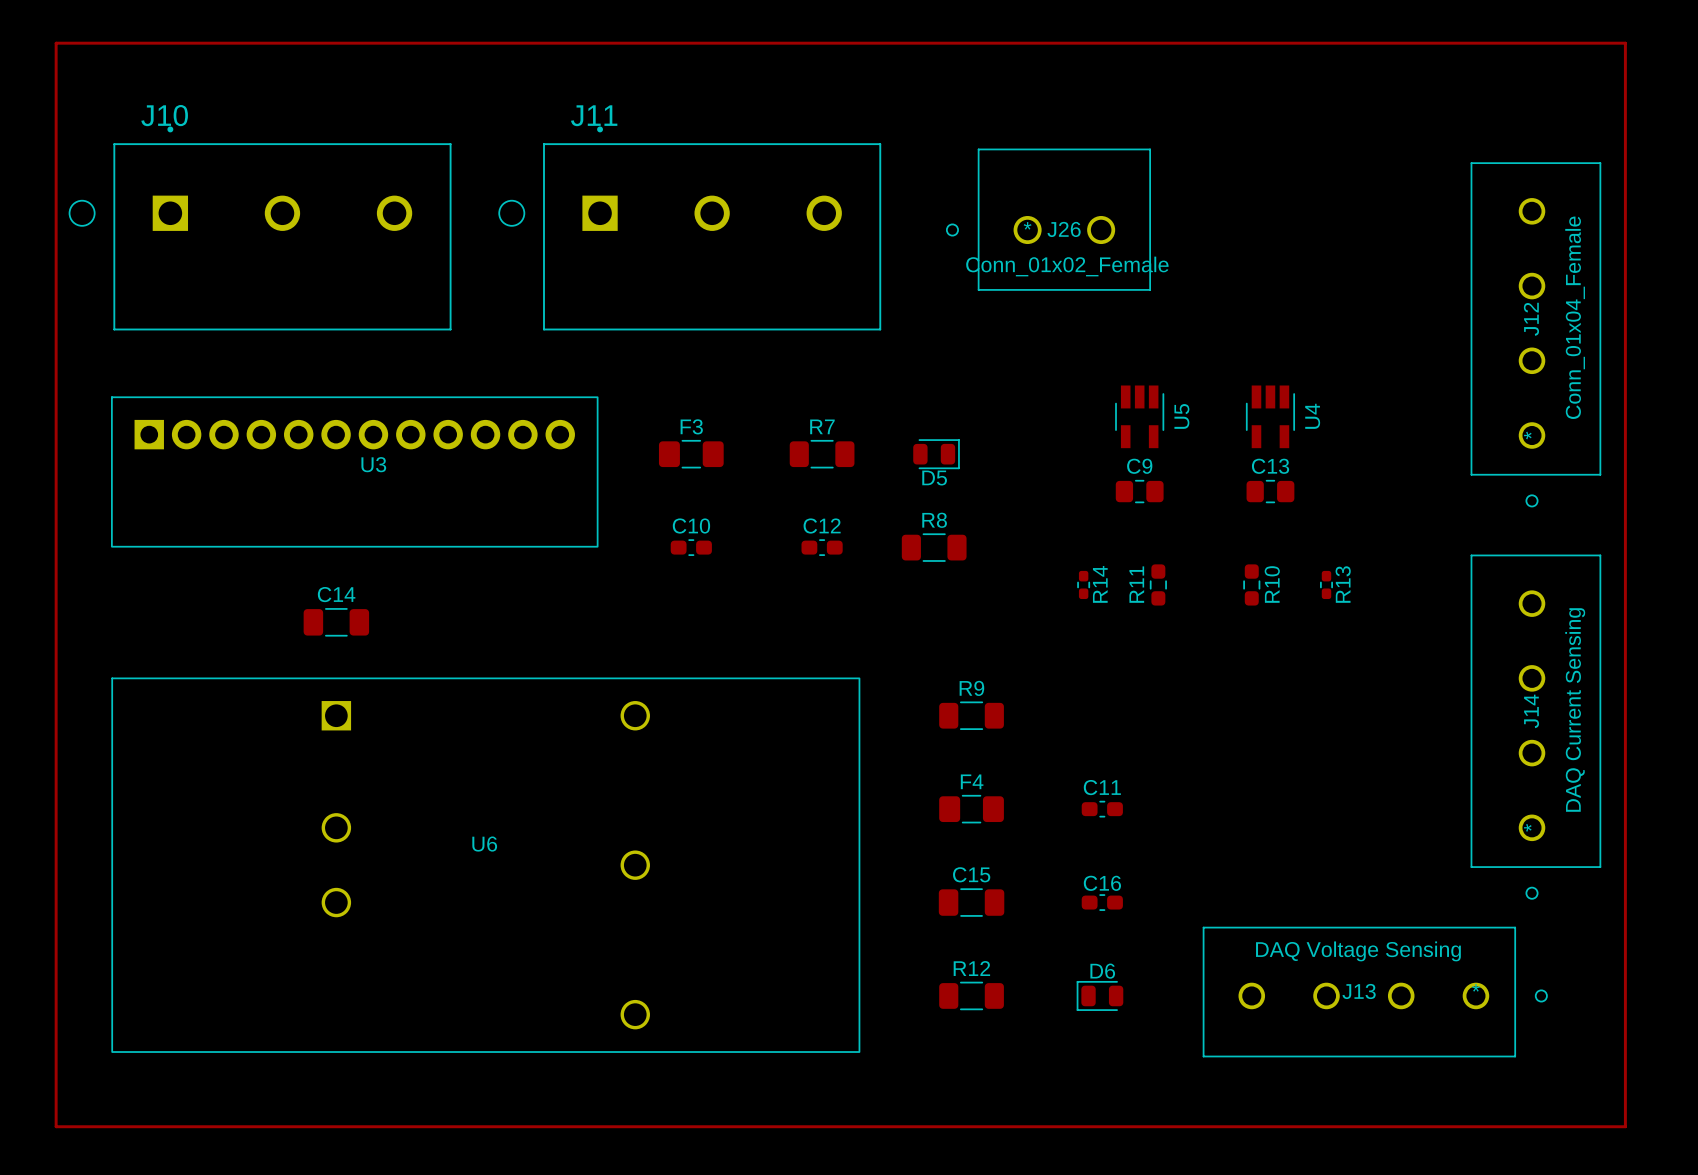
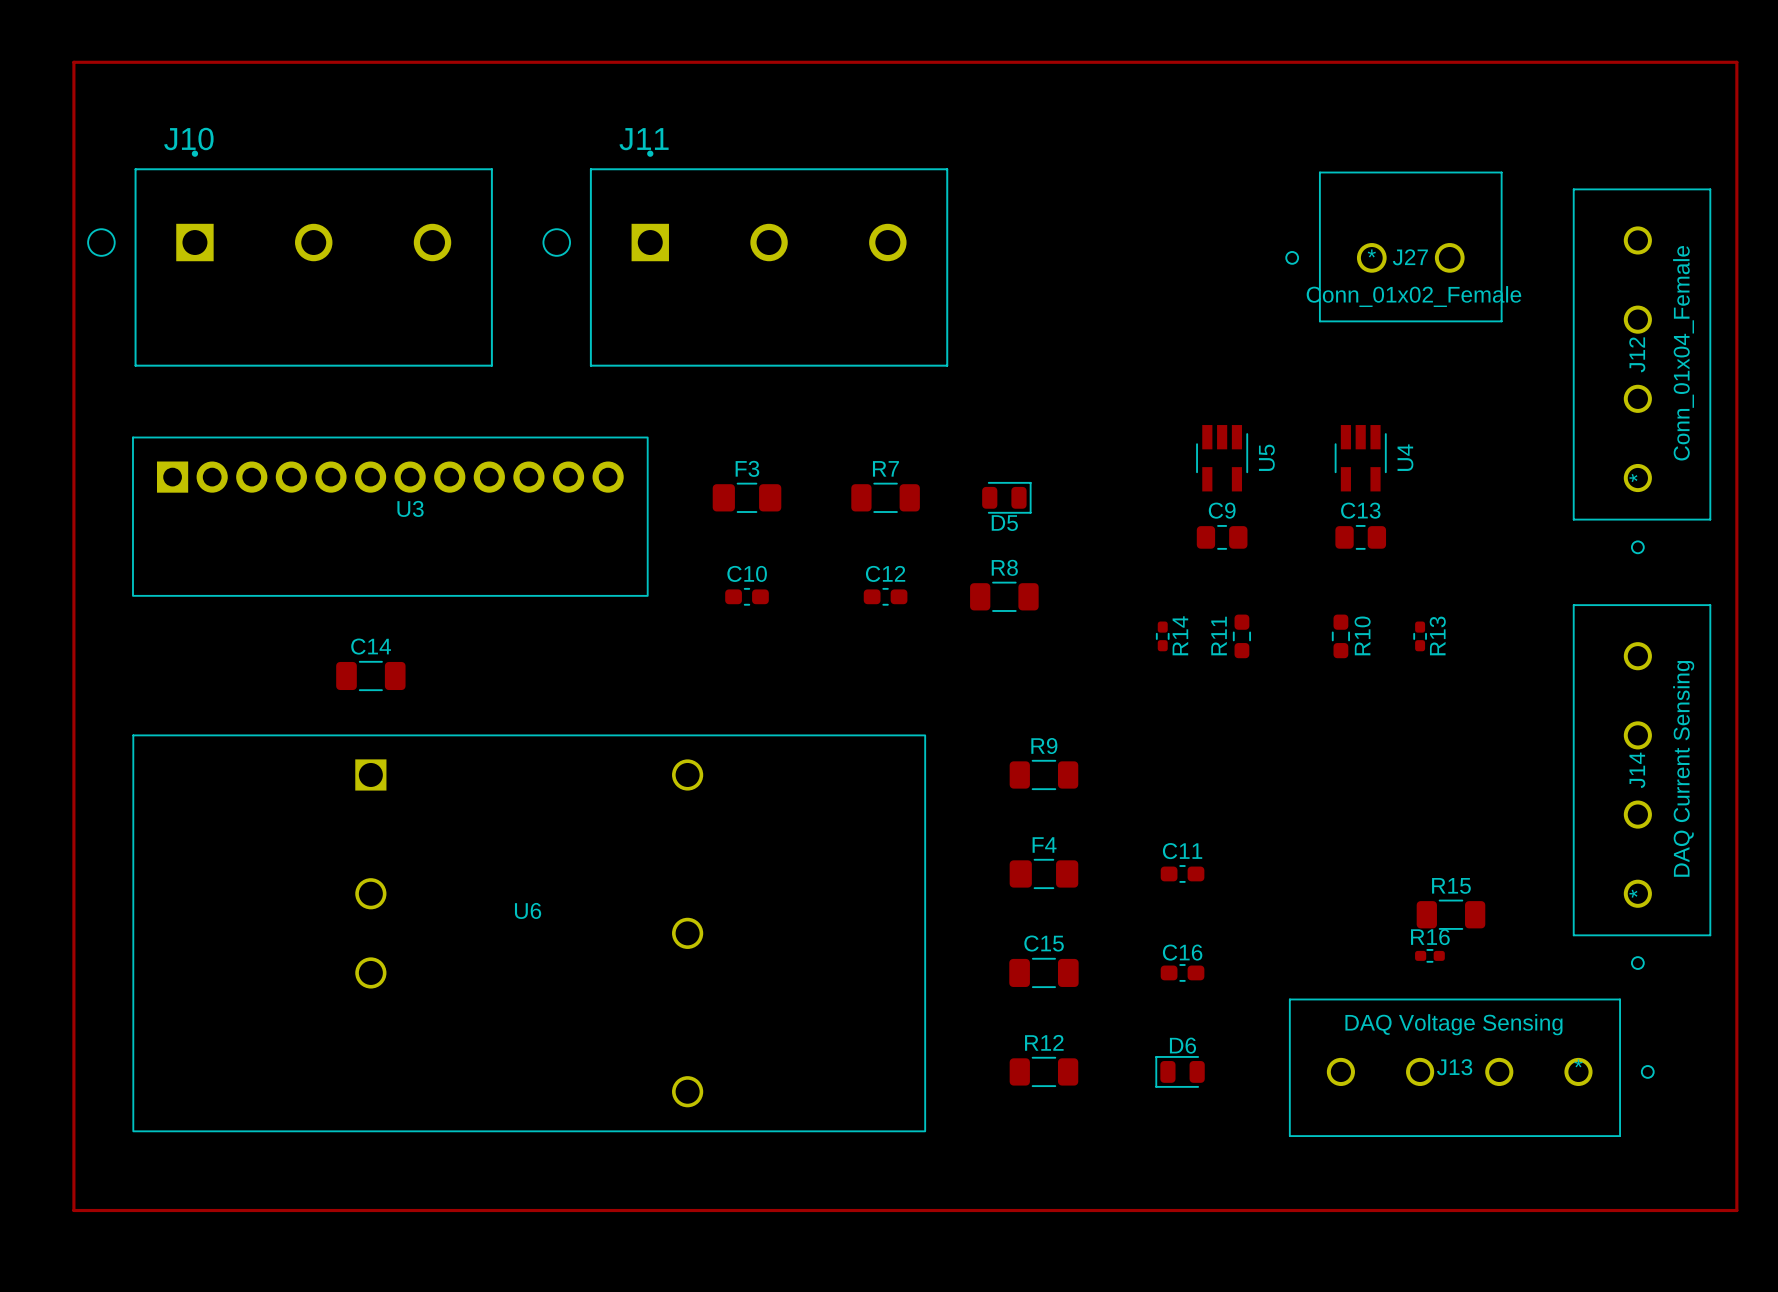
J27: none -> Conn_01x02_Female (1393, 246)
J26: Conn_01x02_Female (1048, 219) -> none
R15: none -> (1450, 914)
R16: none -> (1429, 955)

